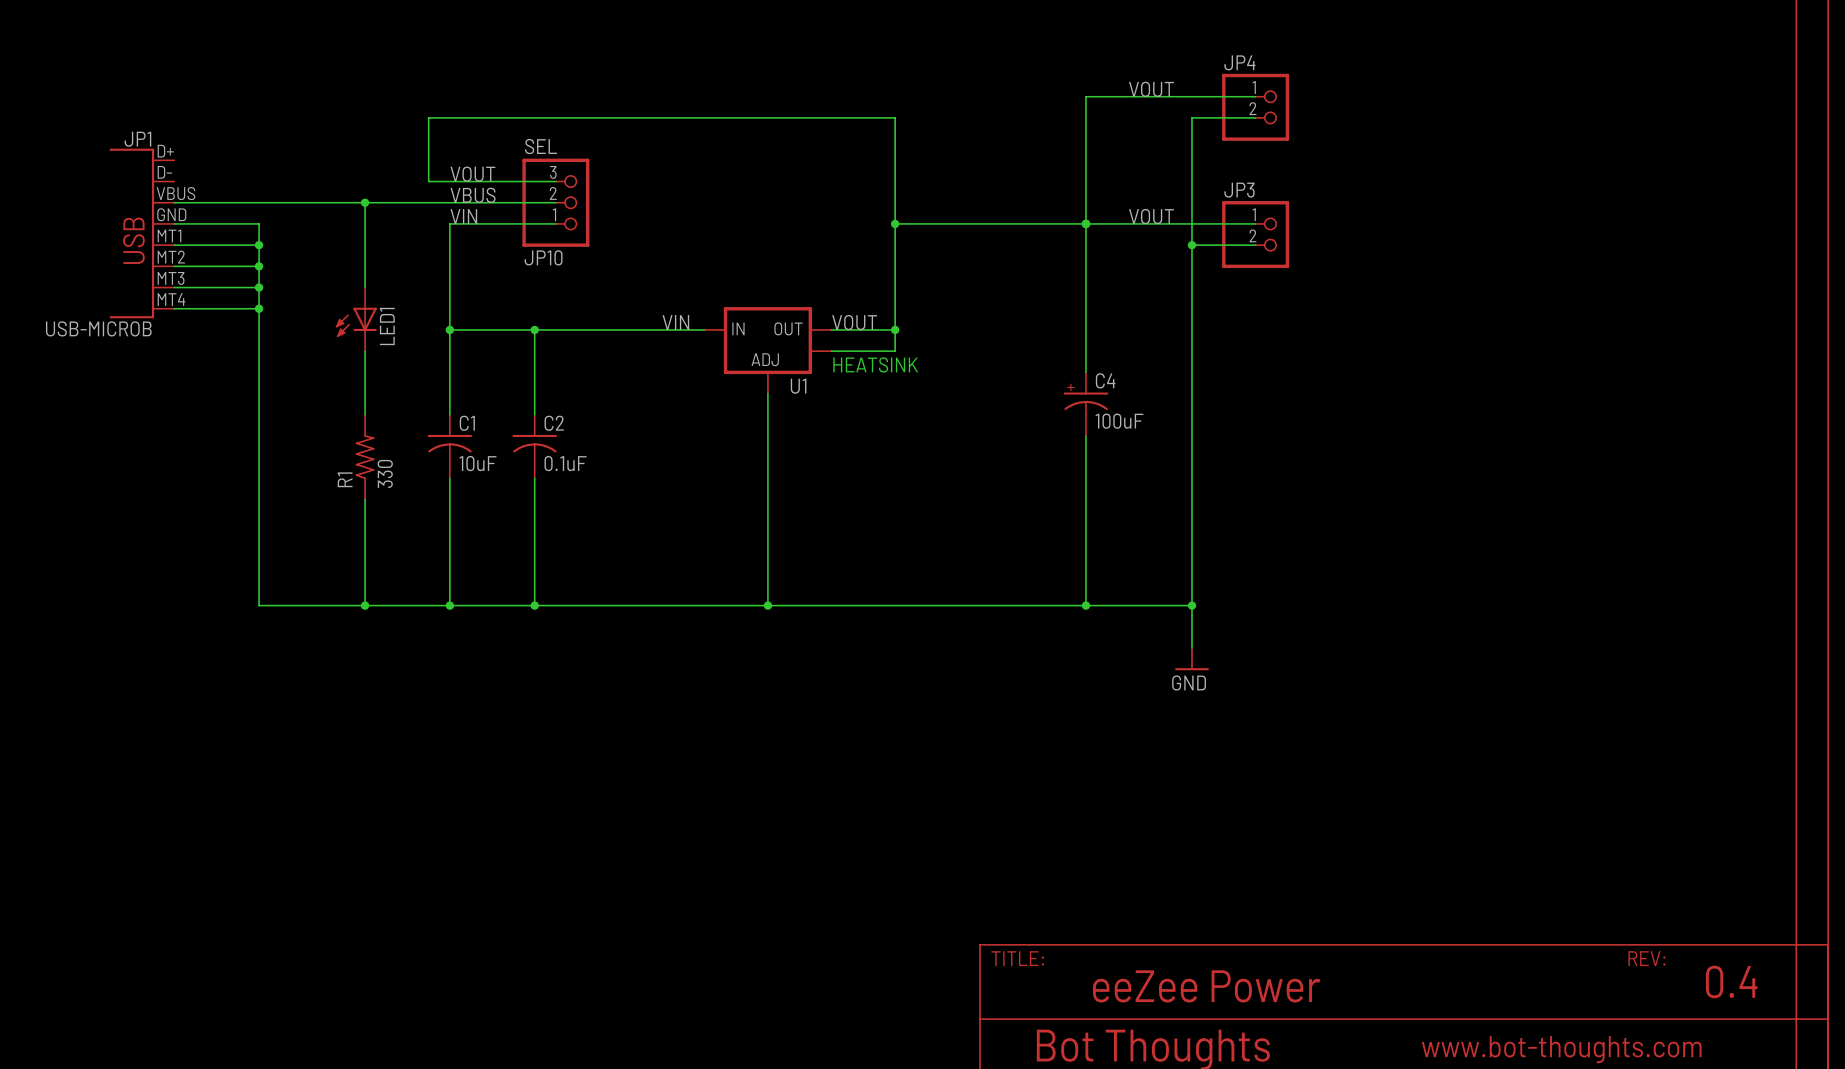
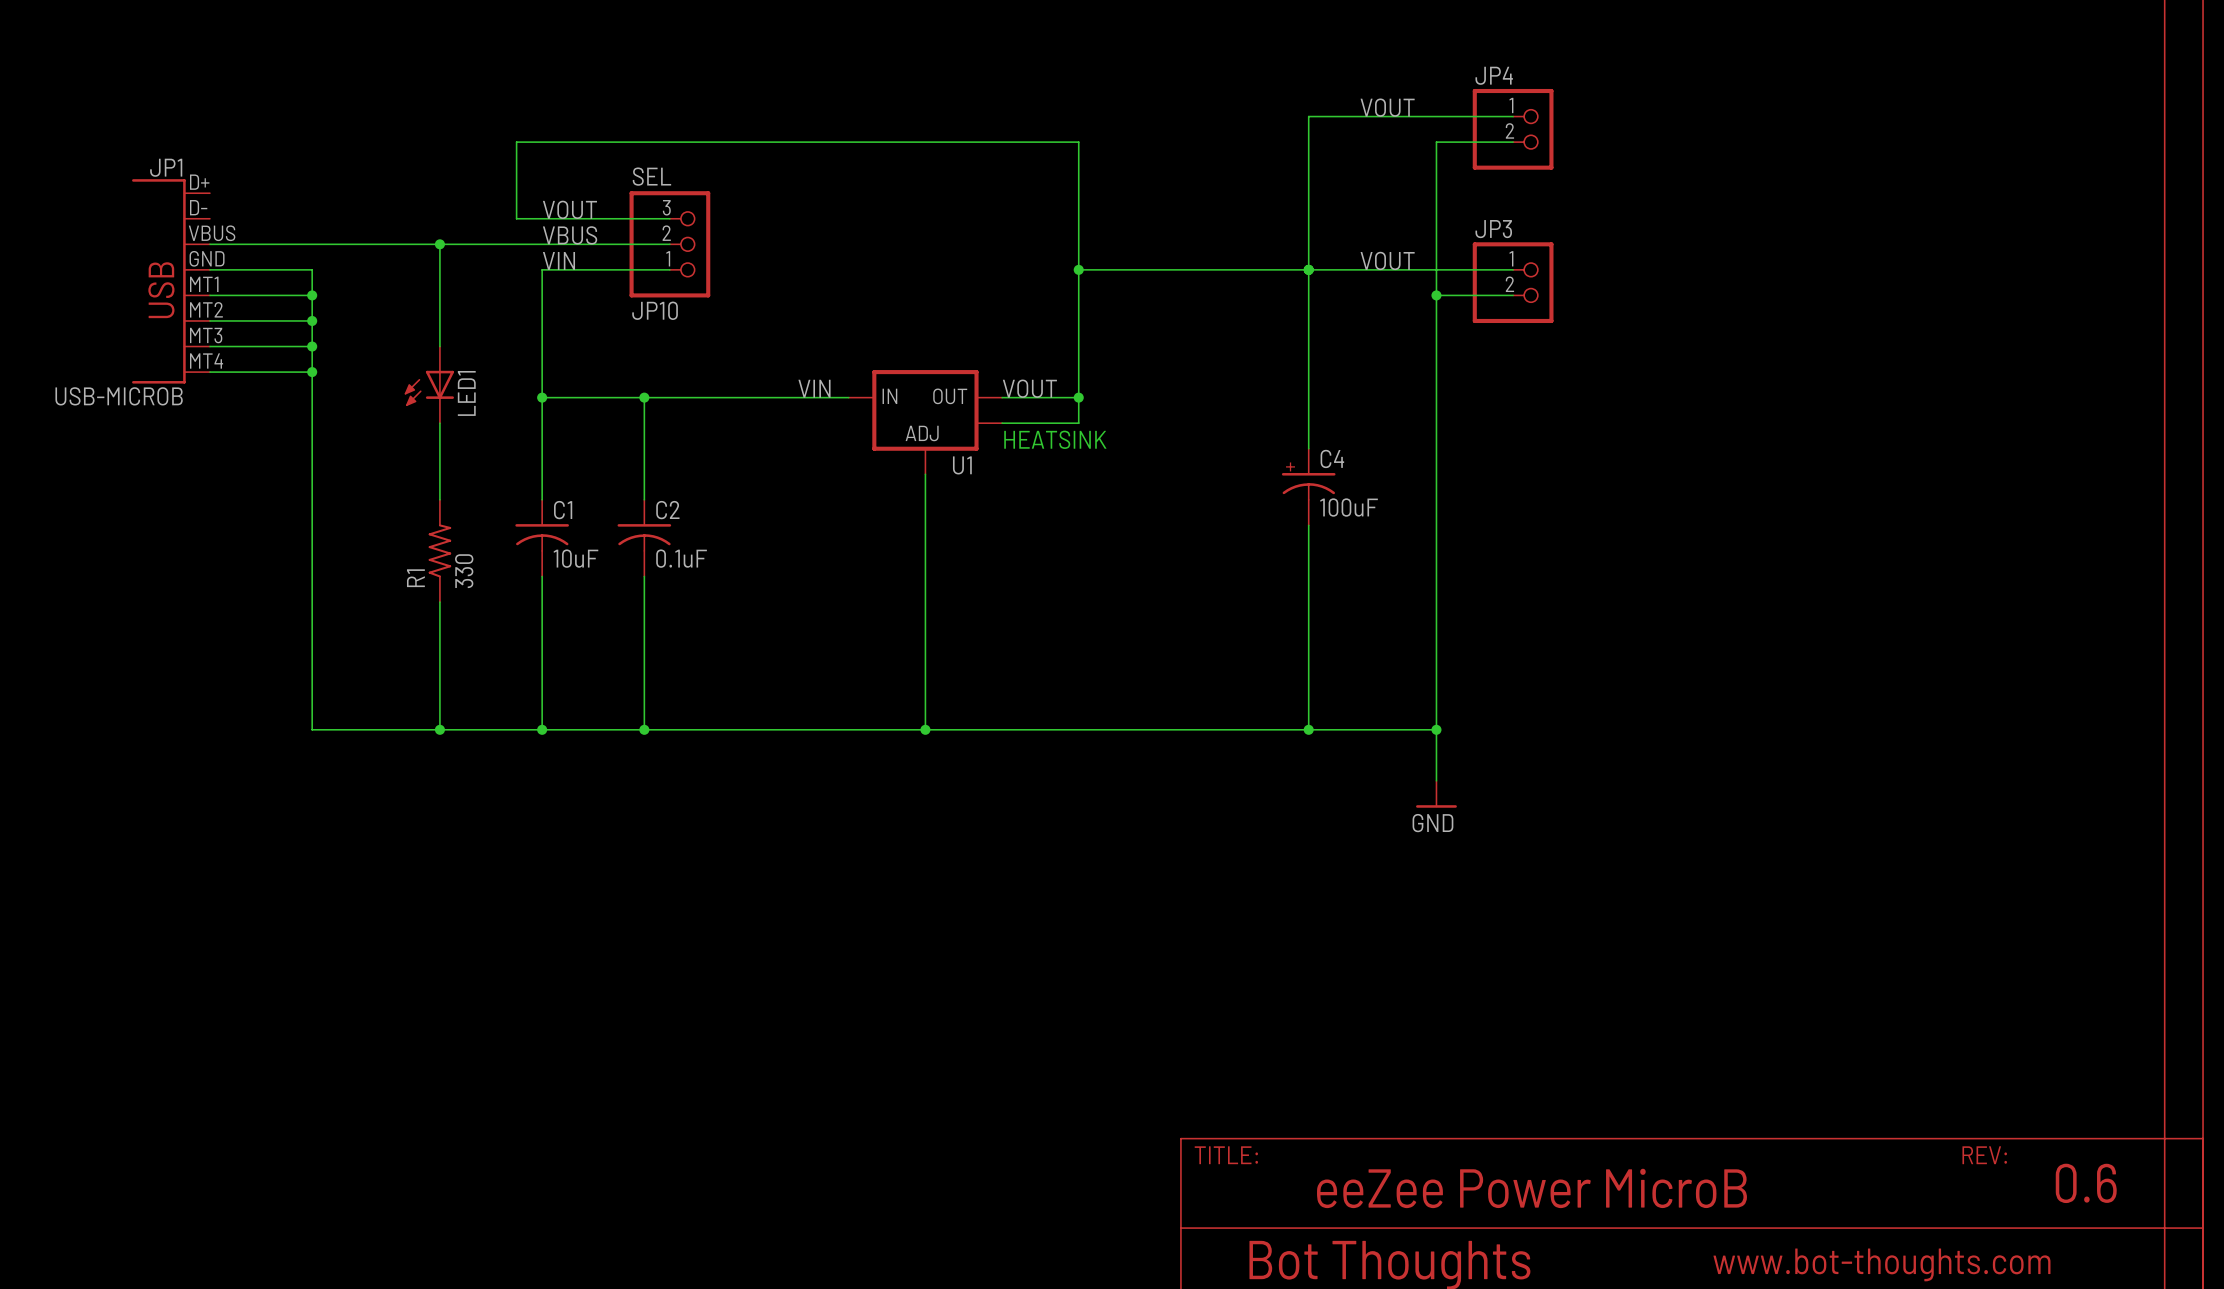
text: 0.4 (1731, 981) -> 0.6 (2086, 1183)
text: eeZee Power (1206, 986) -> eeZee Power MicroB (1531, 1188)

